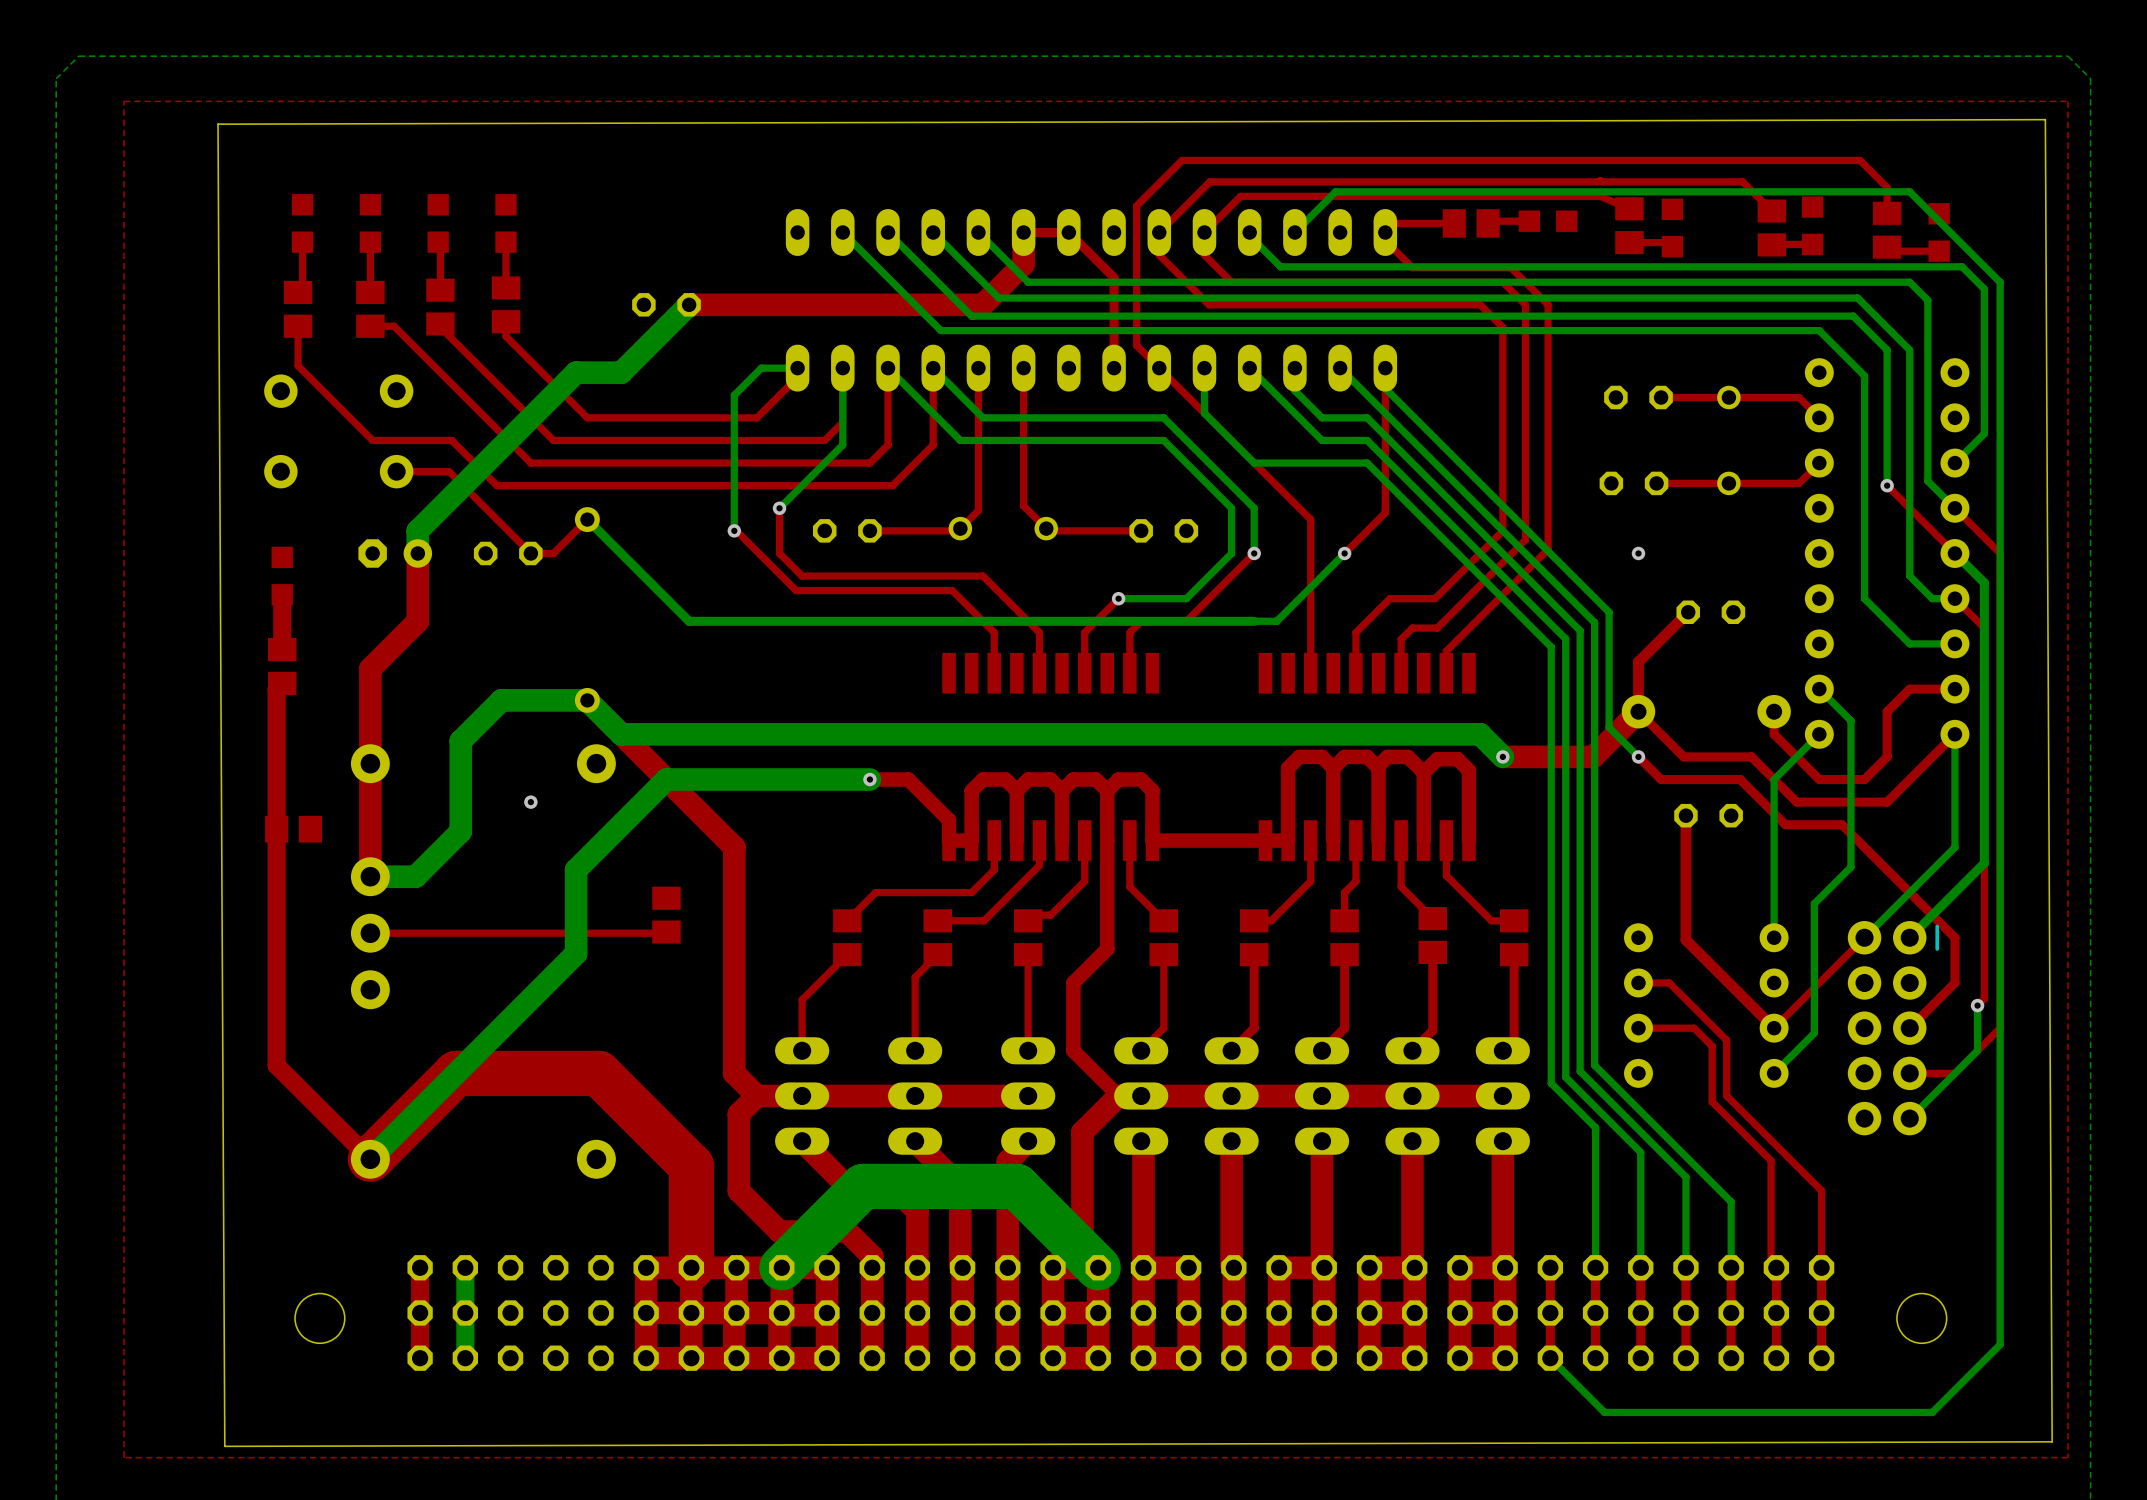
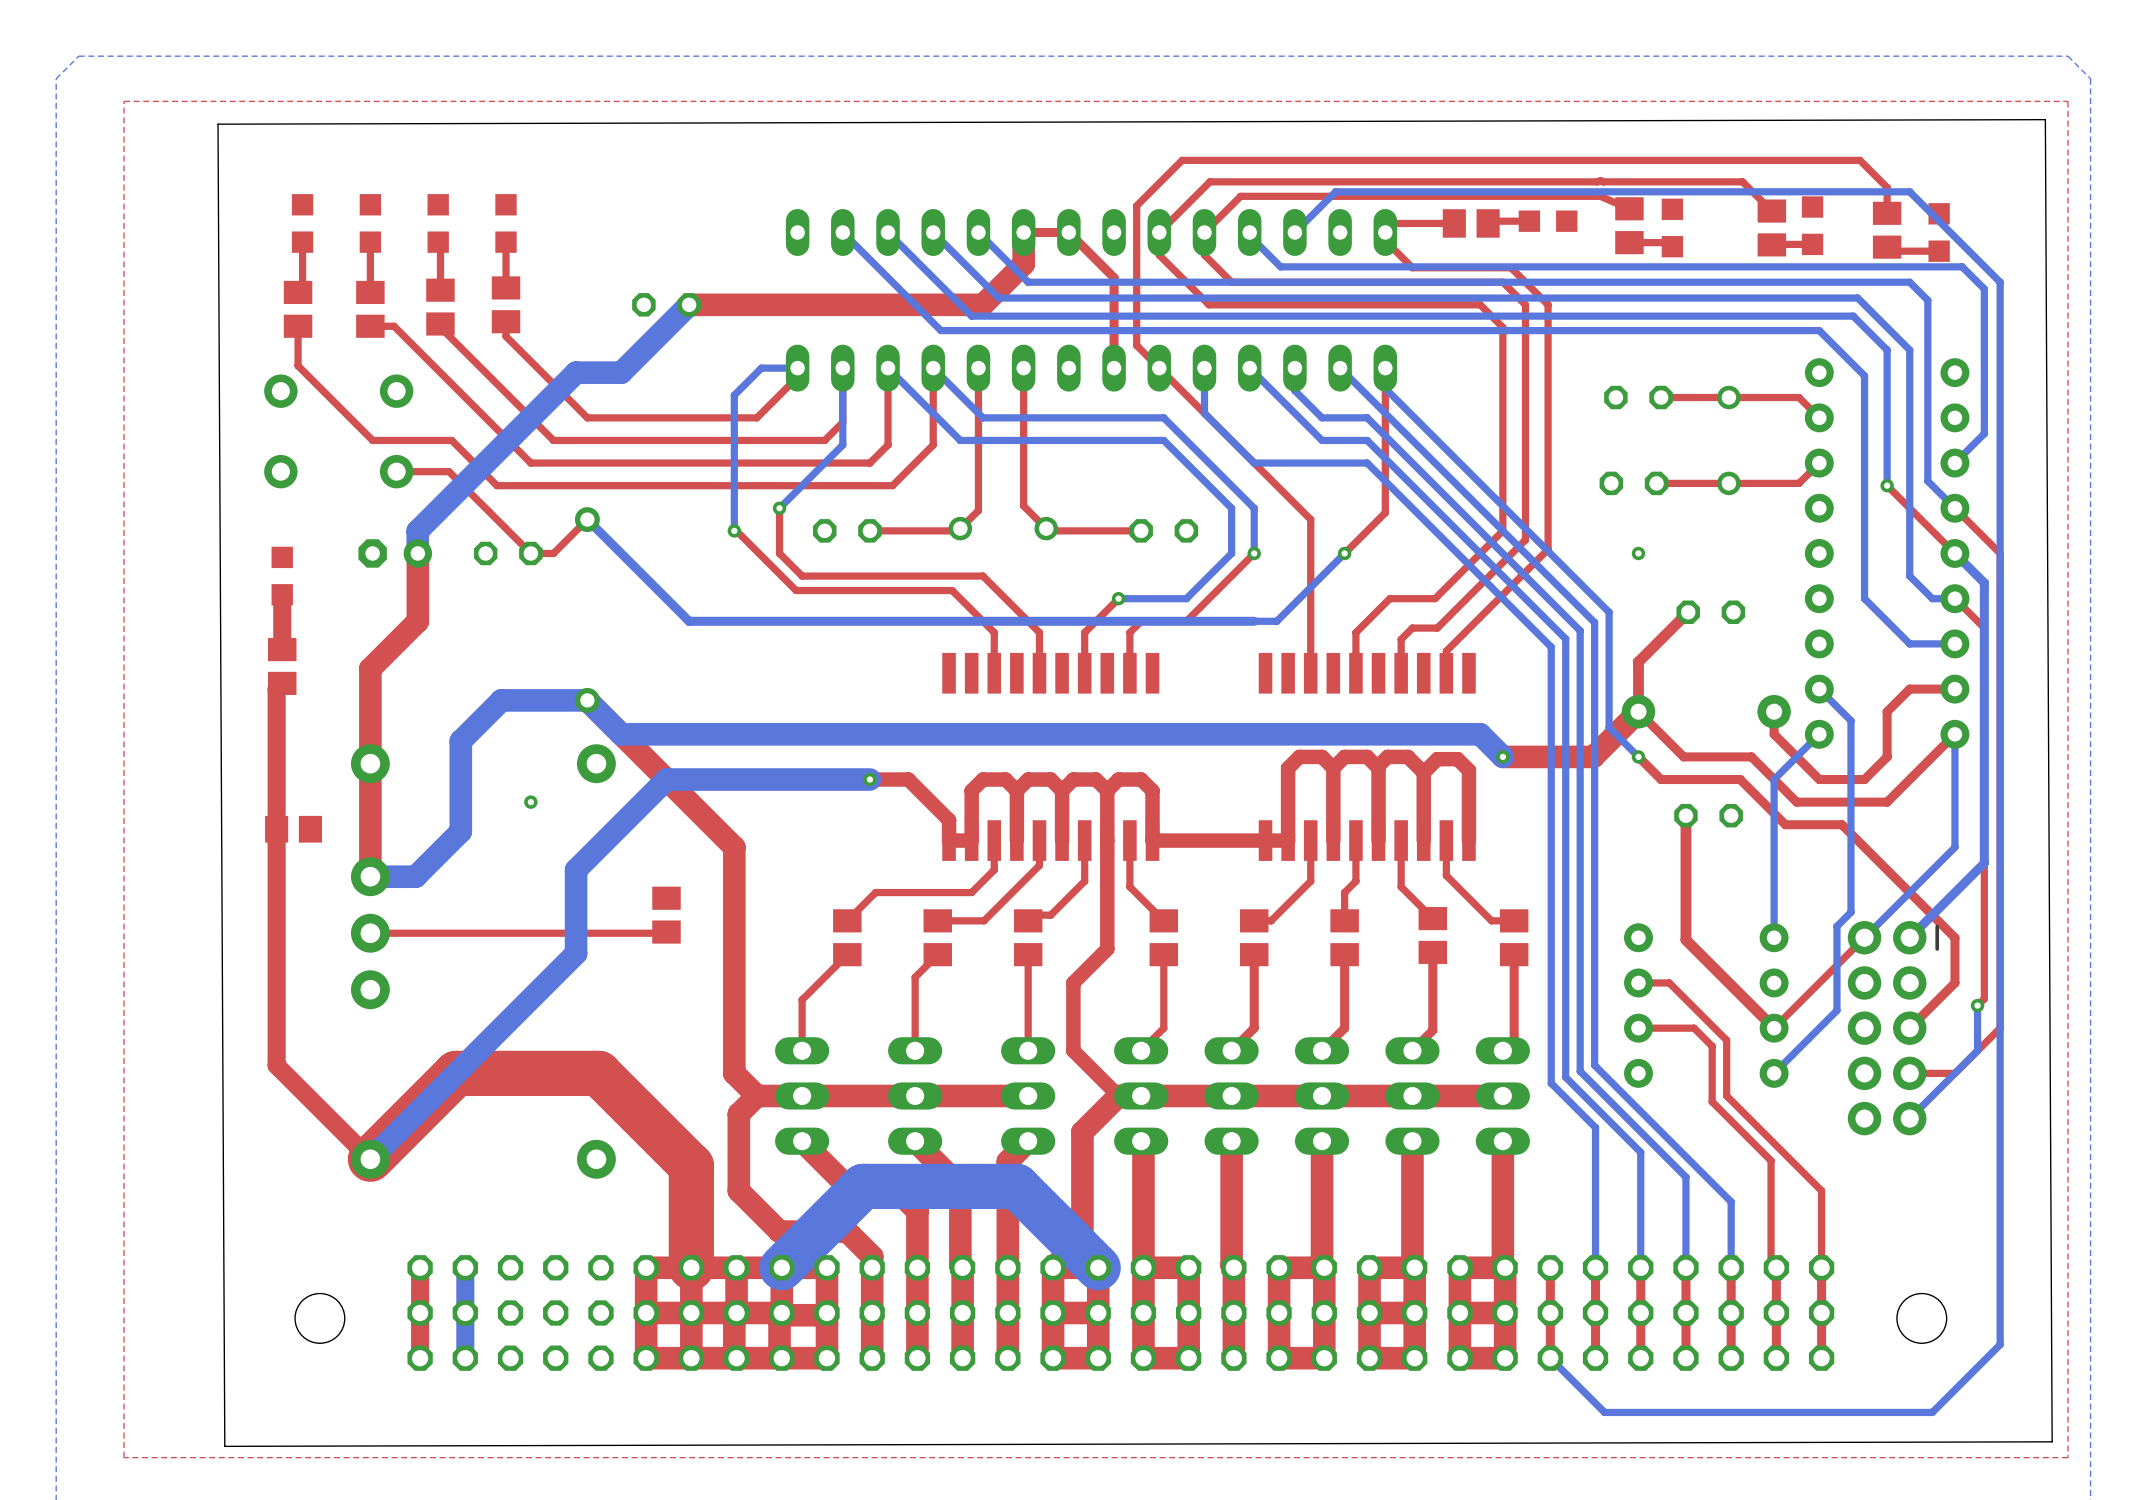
bottom track: (1850, 867) (1814, 903) (1814, 1033) -> (1850, 867) (1850, 912) (1836, 926) (1836, 1010) (1814, 1033)

